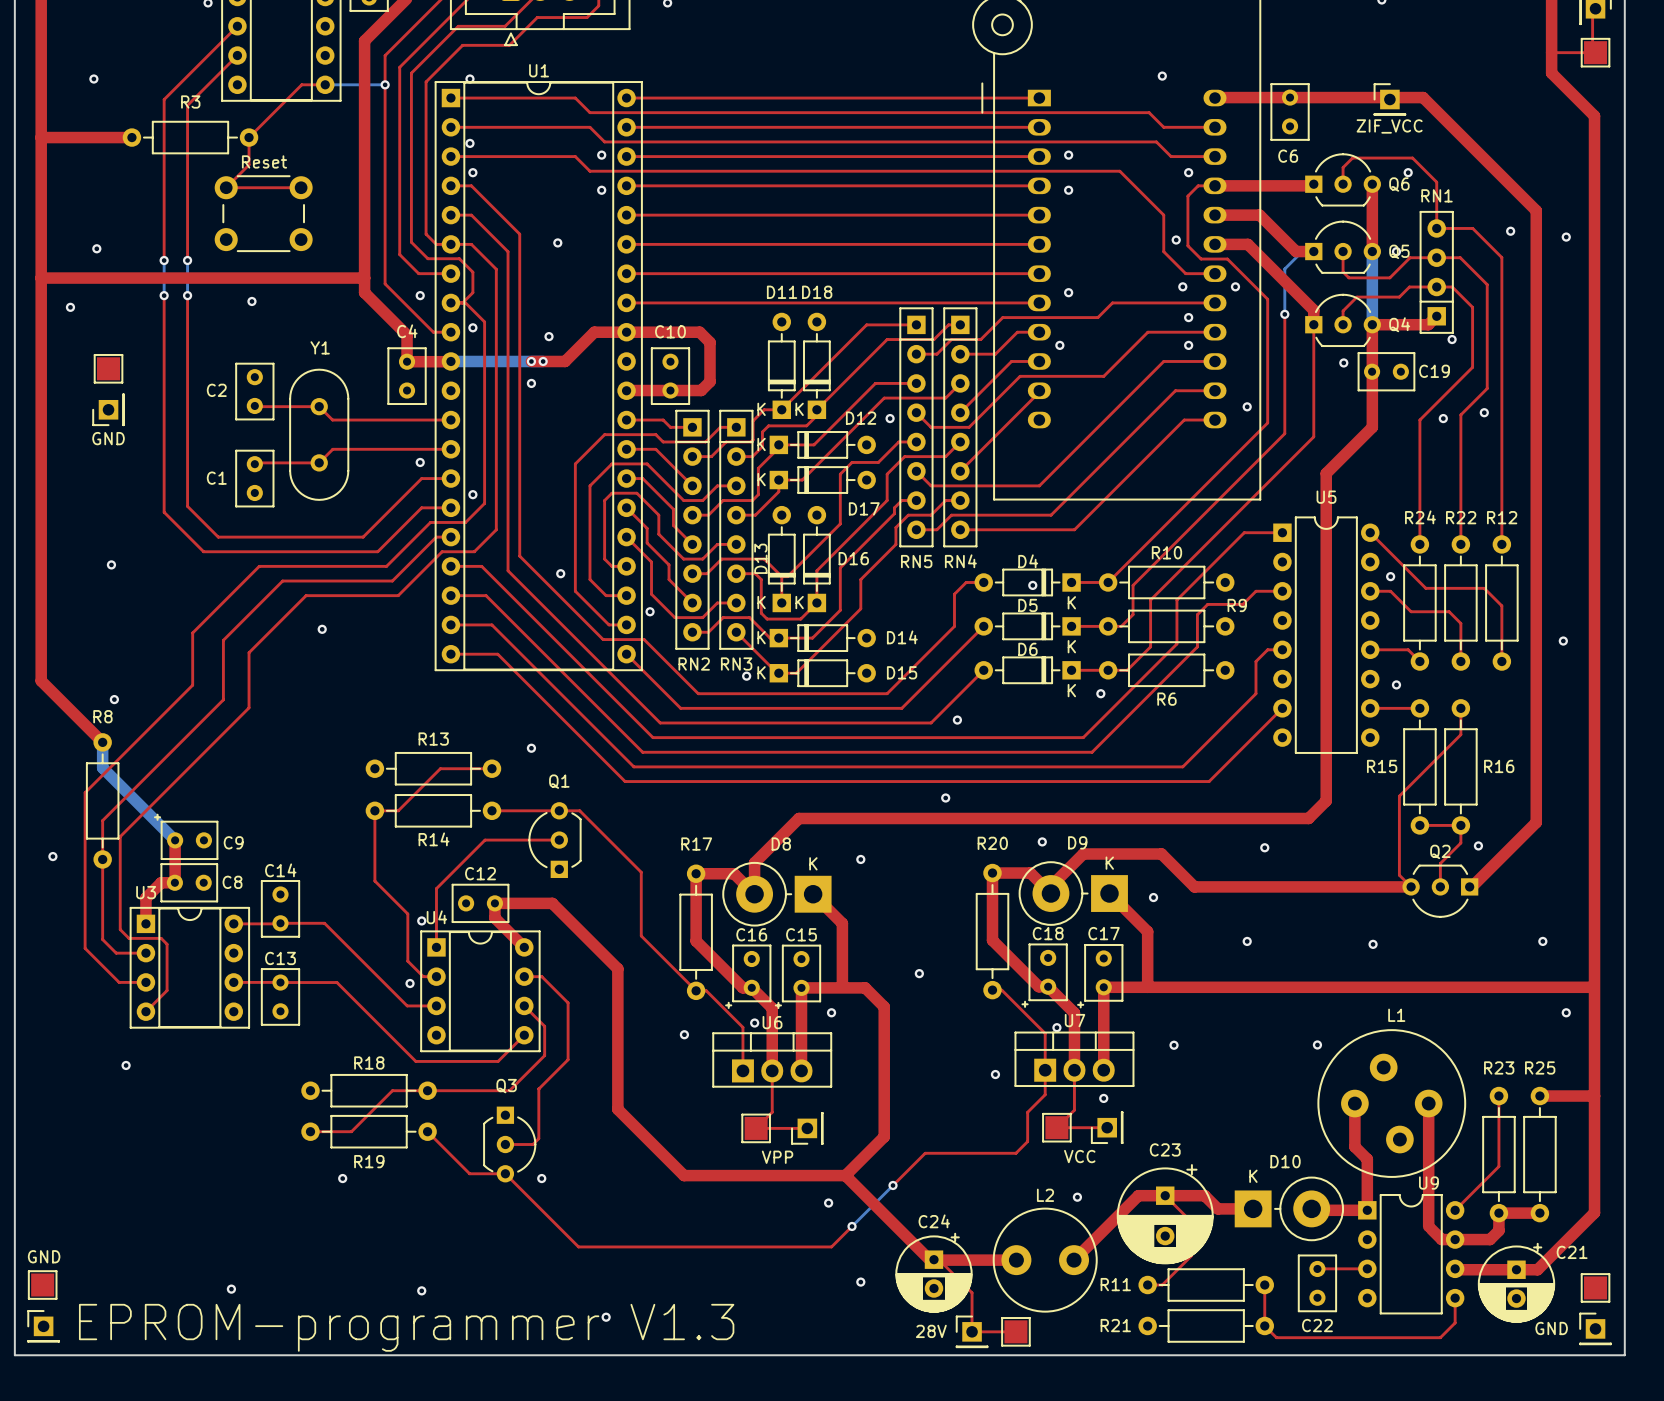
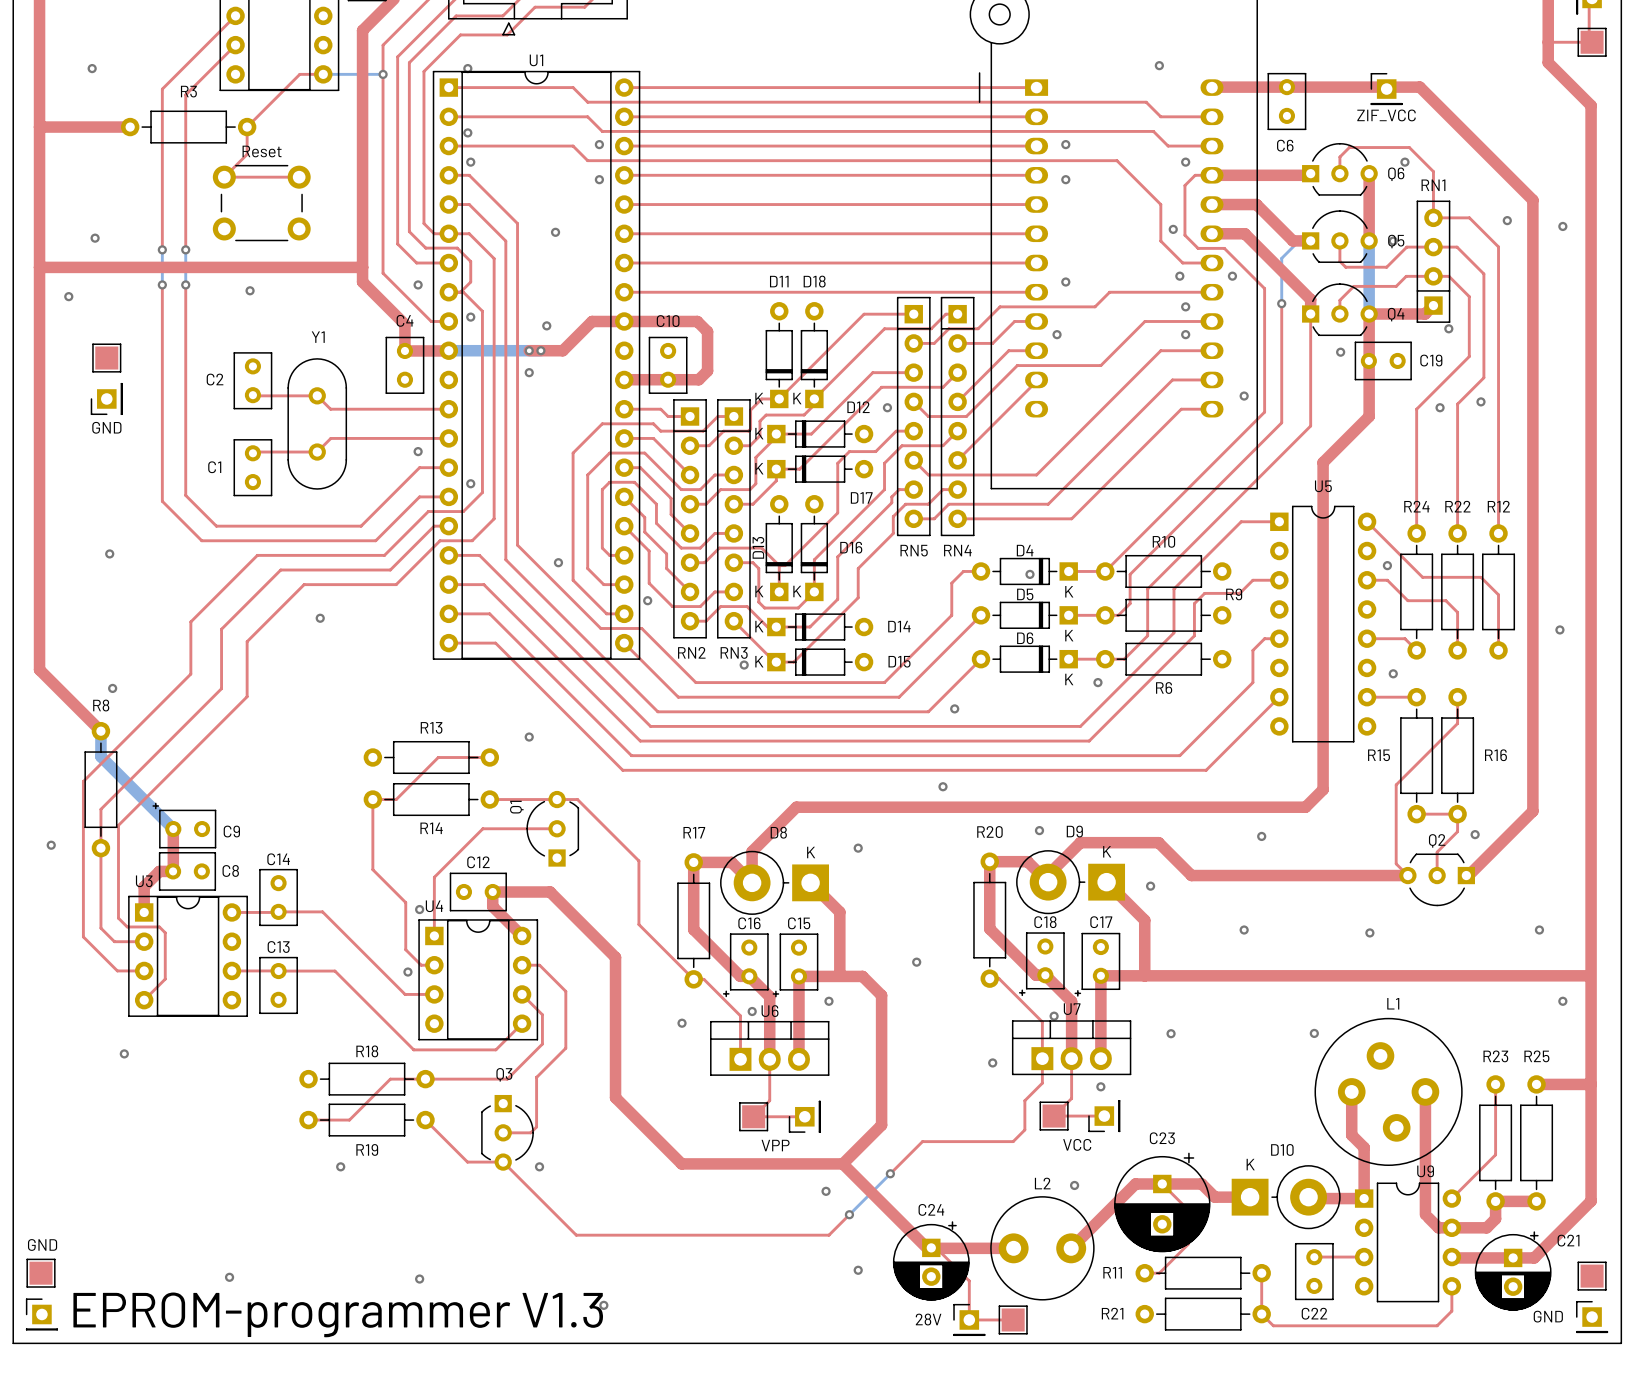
Q1 name rotation: 0° (559, 781) -> 90° counterclockwise (516, 807)
Q1 name position: Q1 (559, 781) -> Q1 (516, 807)

